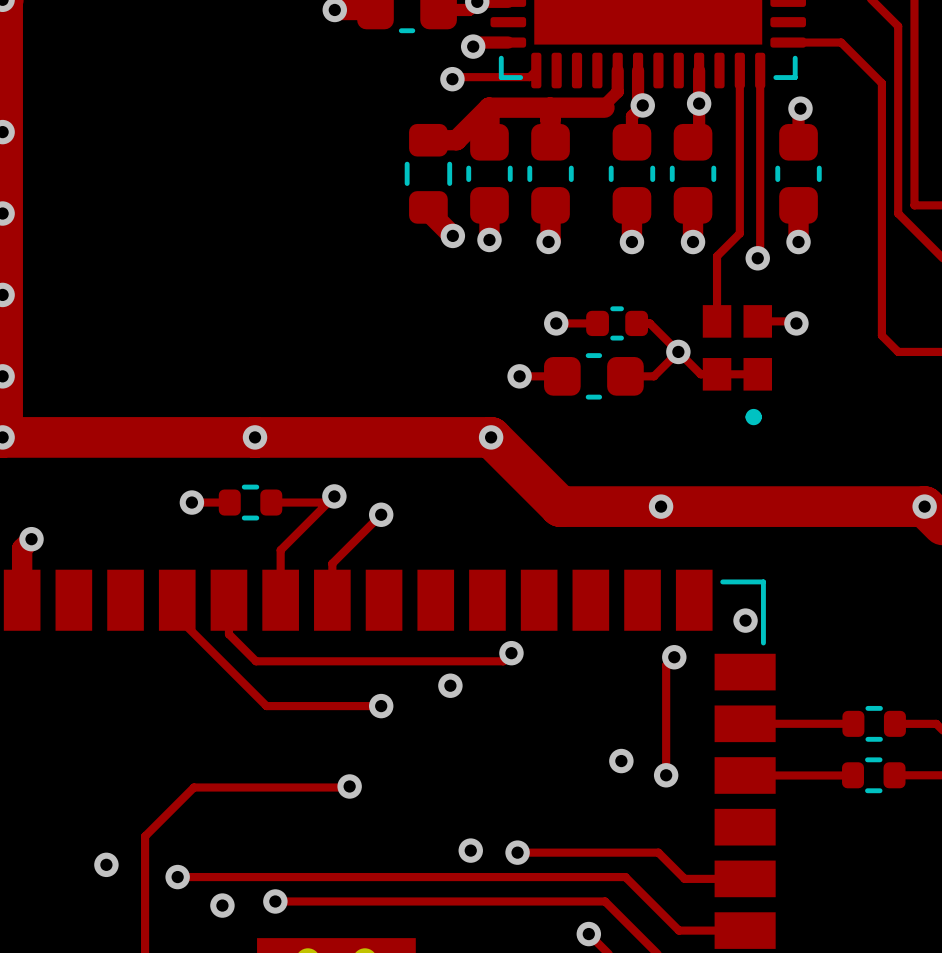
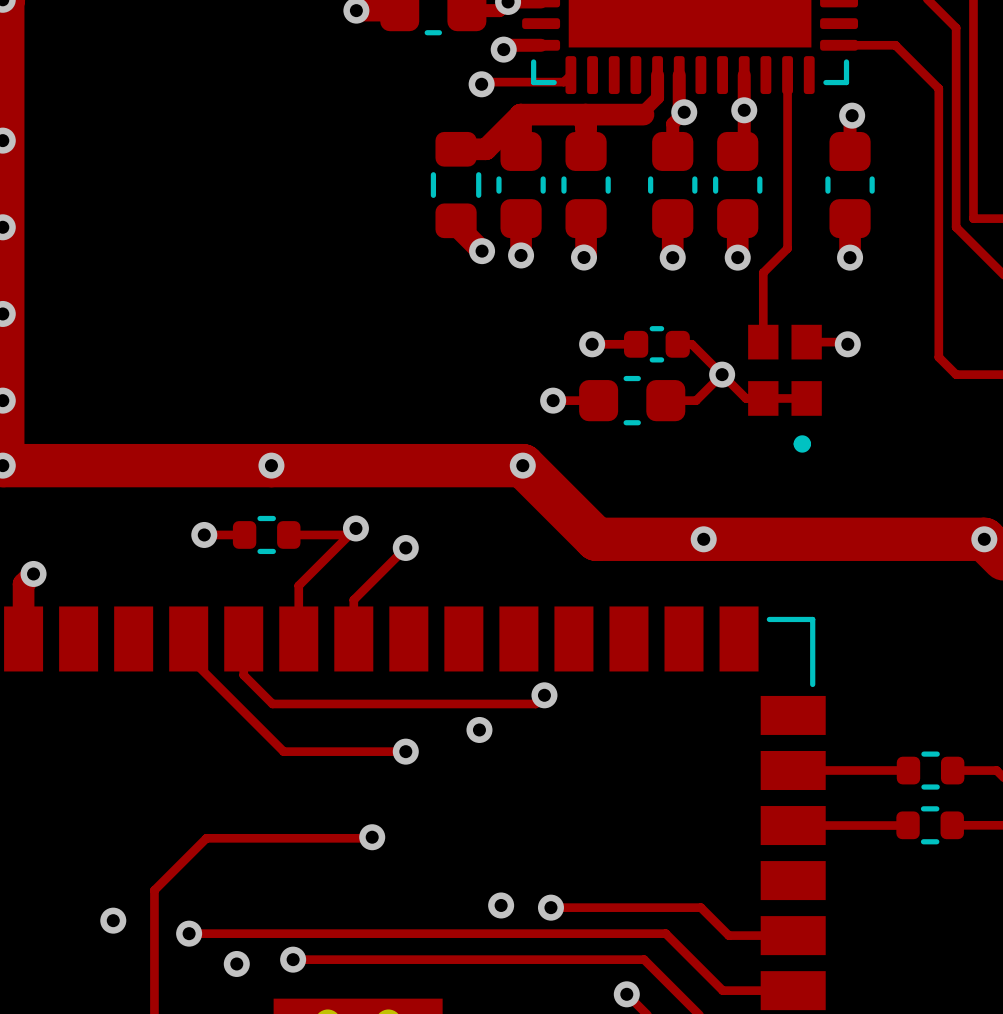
track: (760, 70) (760, 255) (757, 258) -> none
via: (757, 258) -> none
via: (745, 620) -> none
track: (674, 657) (666, 665) (666, 775) -> none
via: (674, 657) -> none
via: (621, 761) -> none
via: (666, 775) -> none

